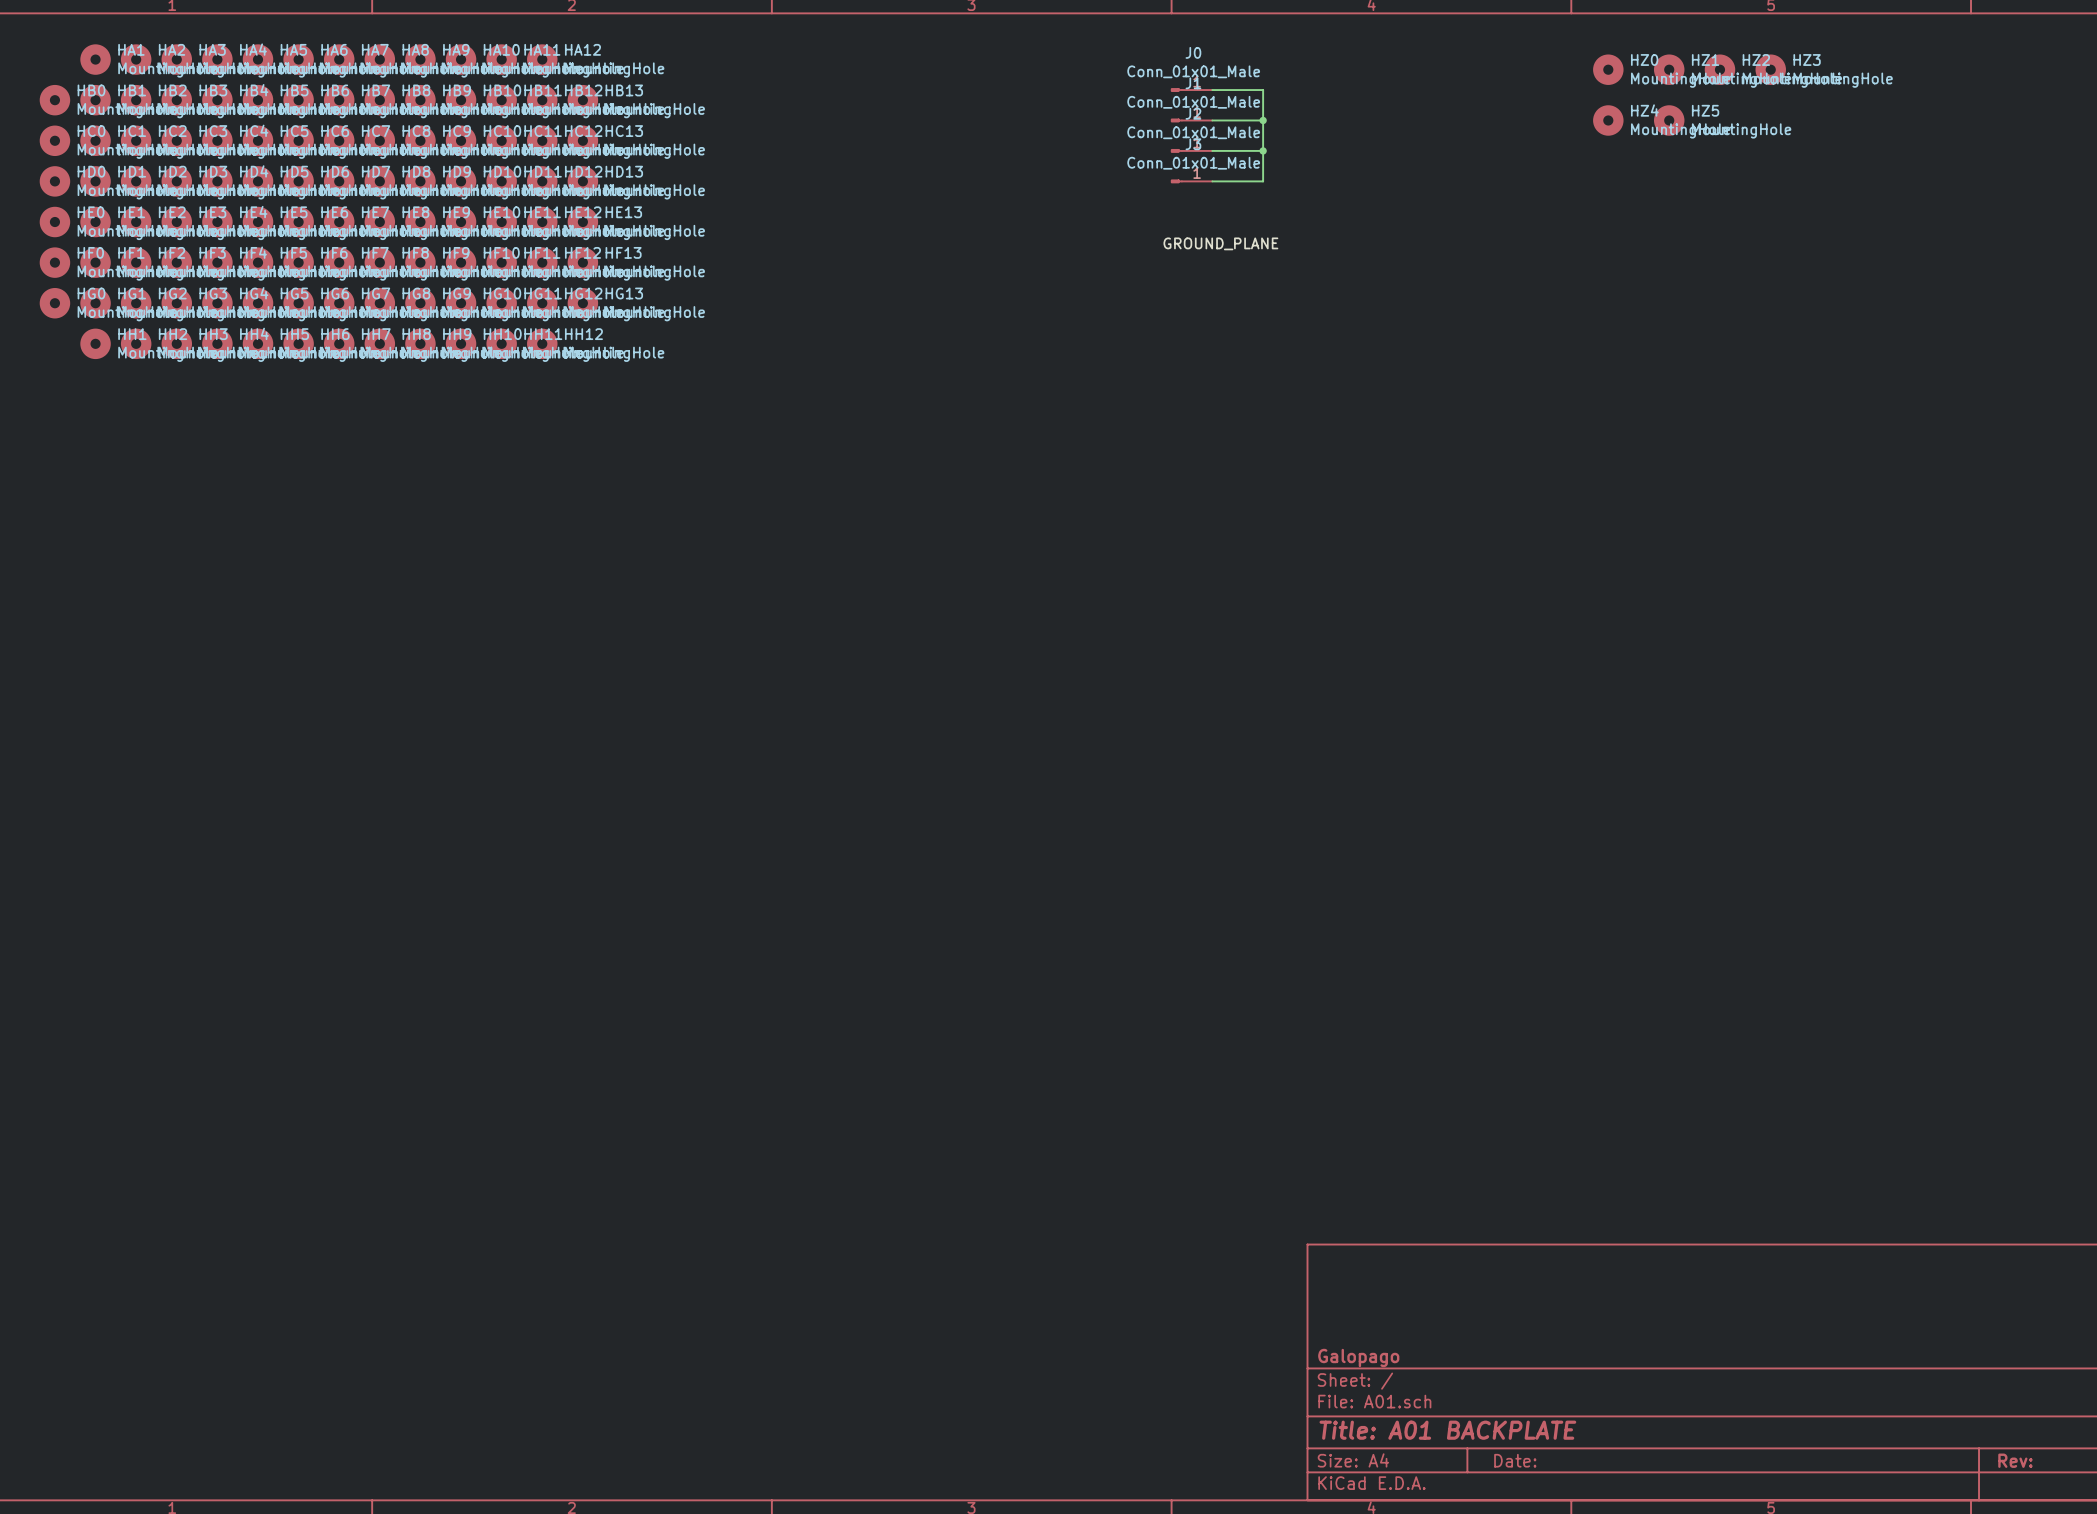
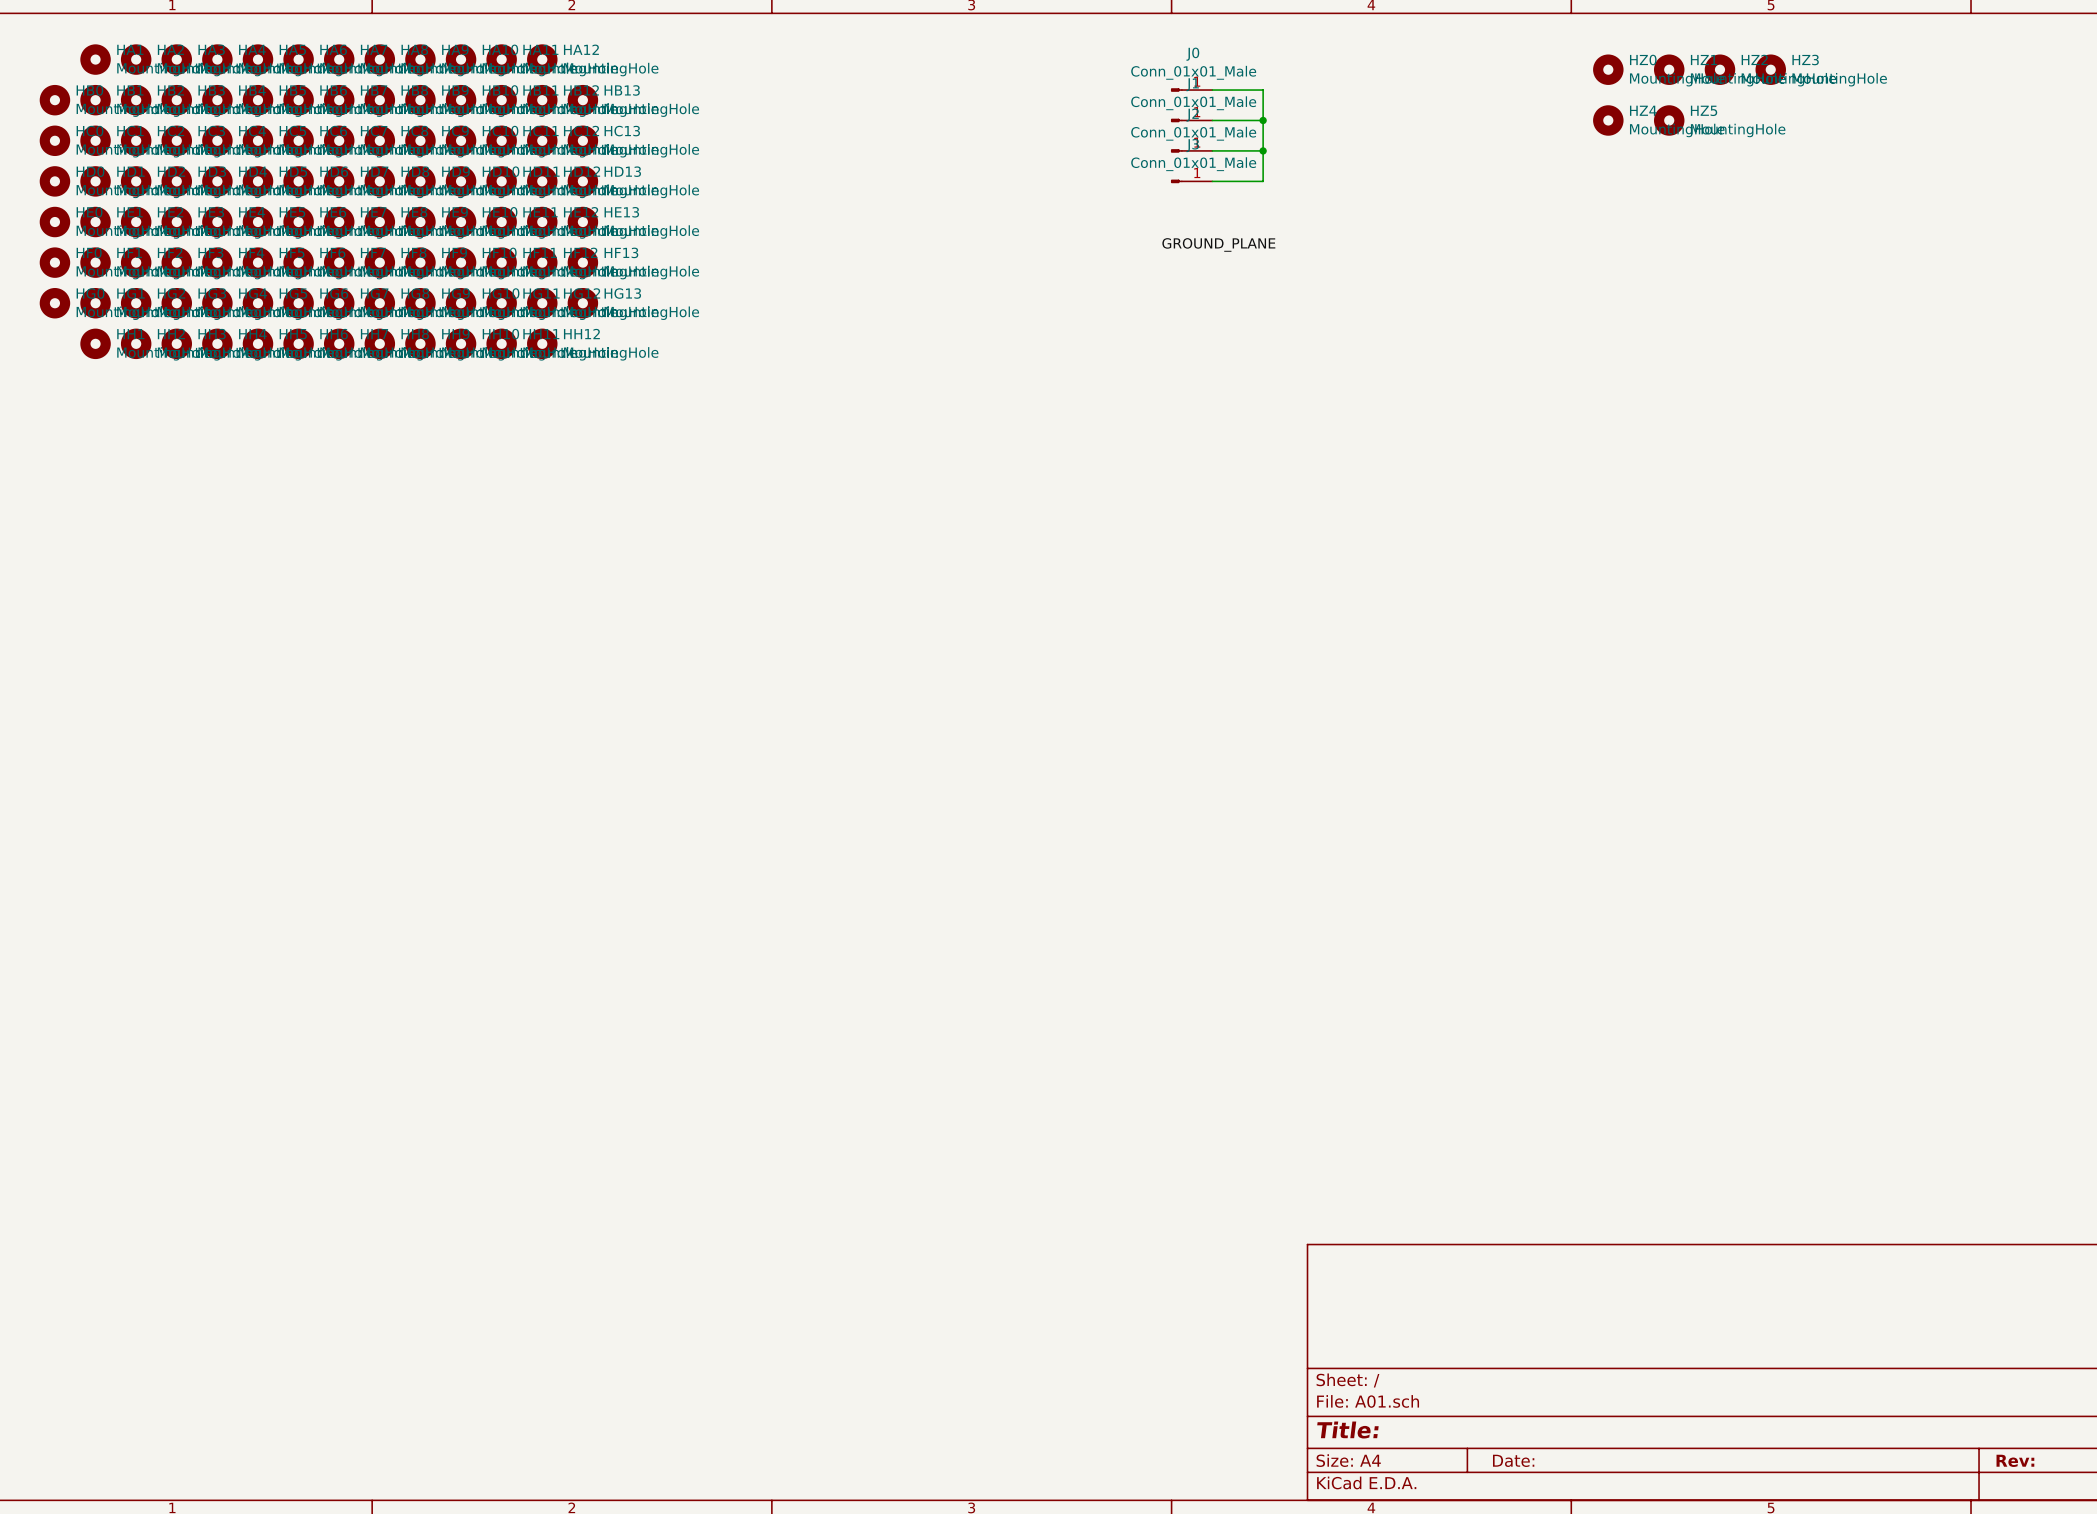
title block: Galopago (1358, 1358) -> none
title block: Title: A01 BACKPLATE (1447, 1430) -> Title: (1347, 1430)

